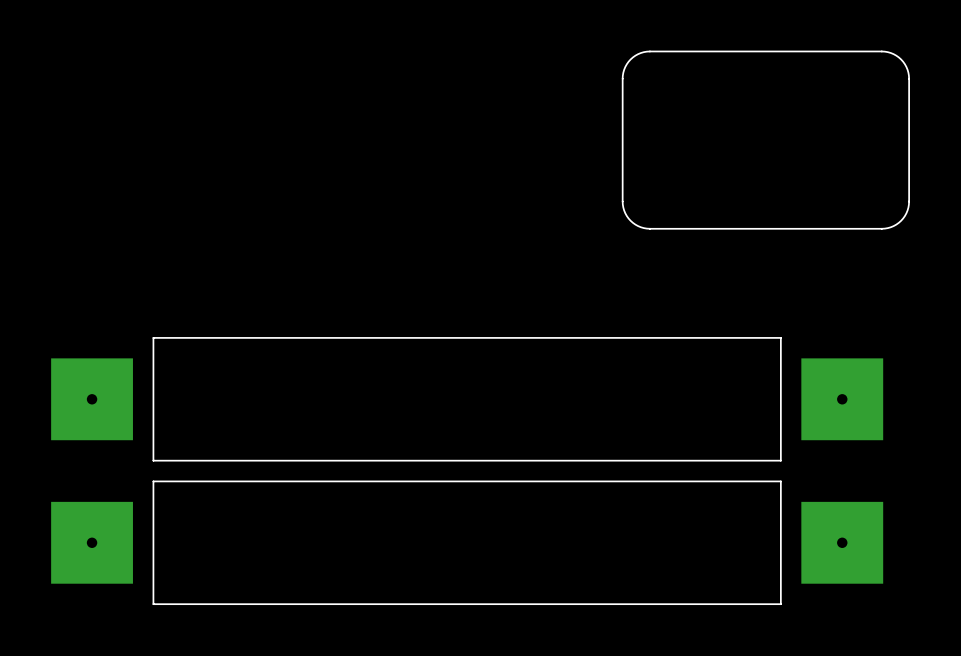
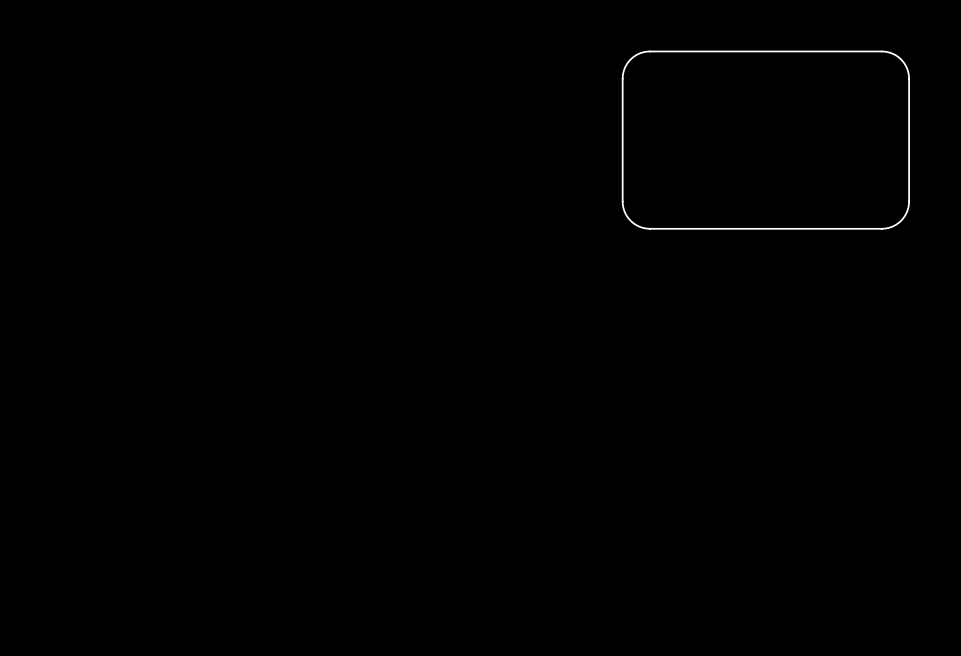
part: (467, 399) -> none
part: (467, 542) -> none

